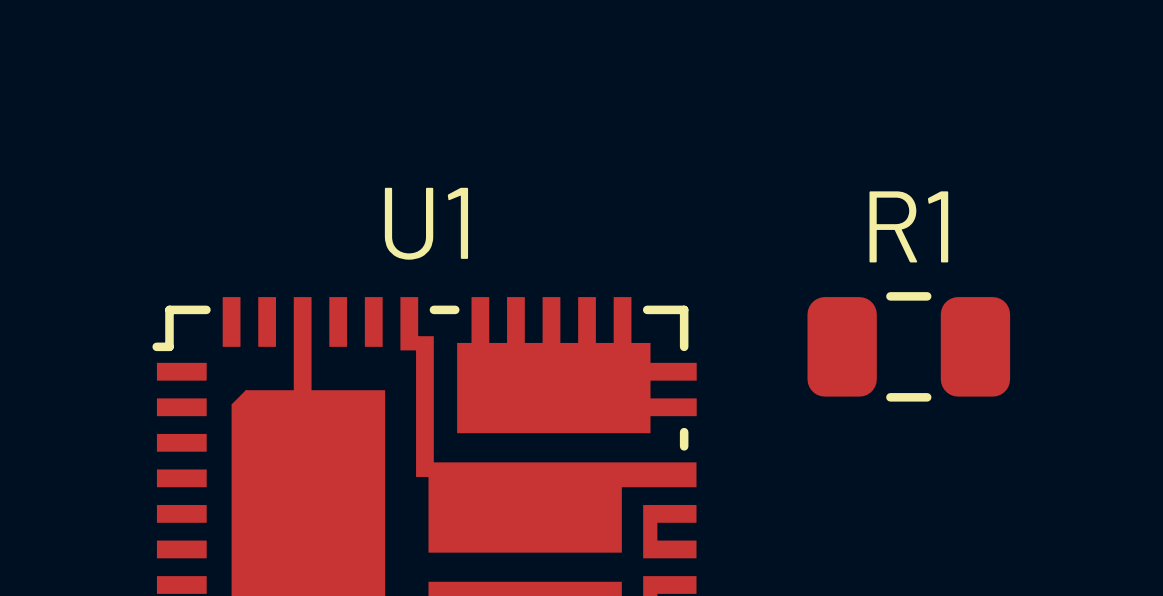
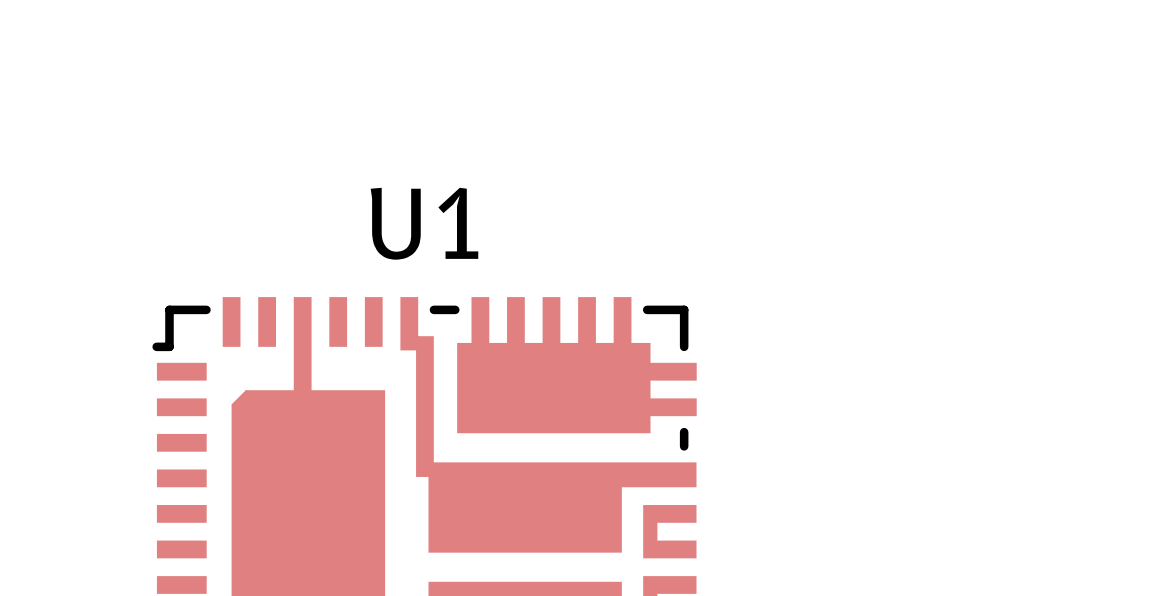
R1: (908, 346) -> none

